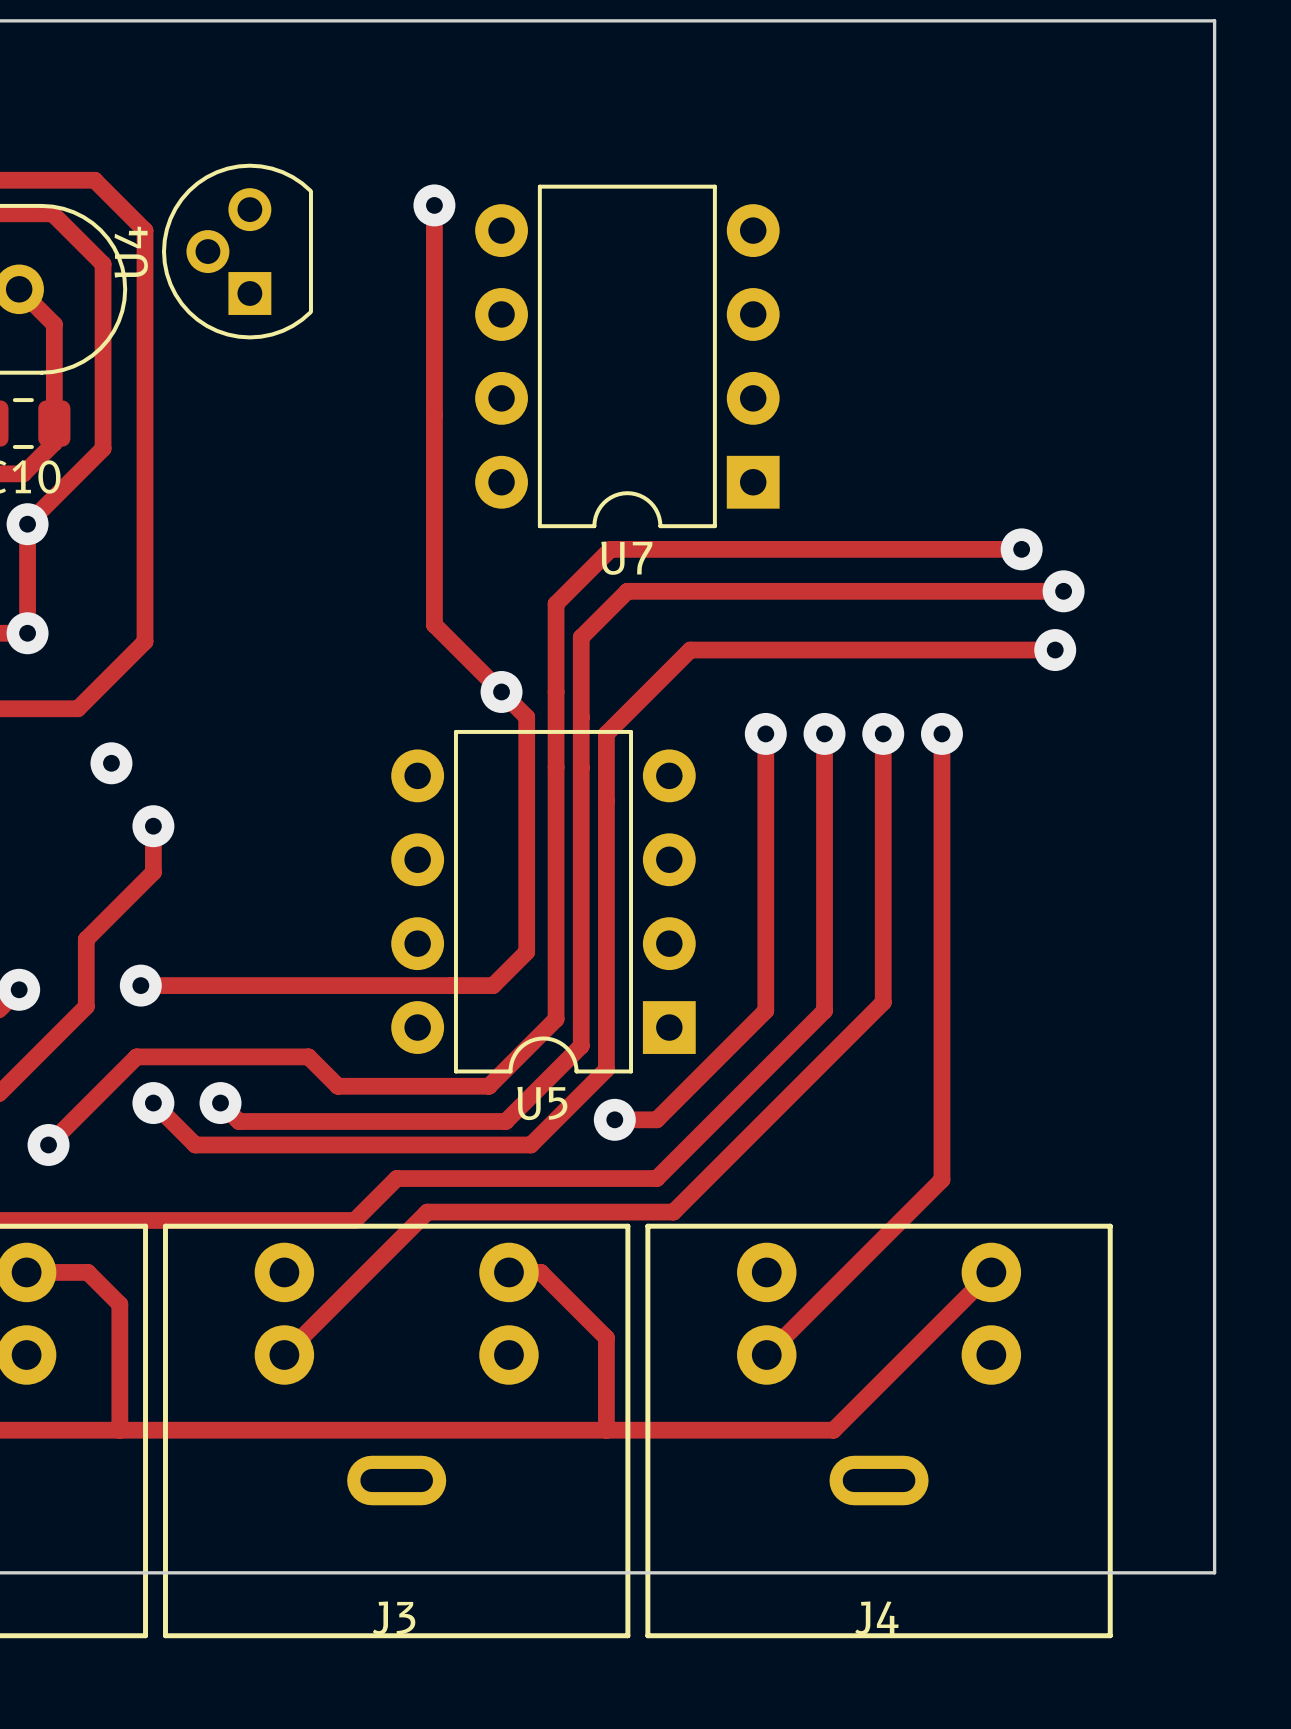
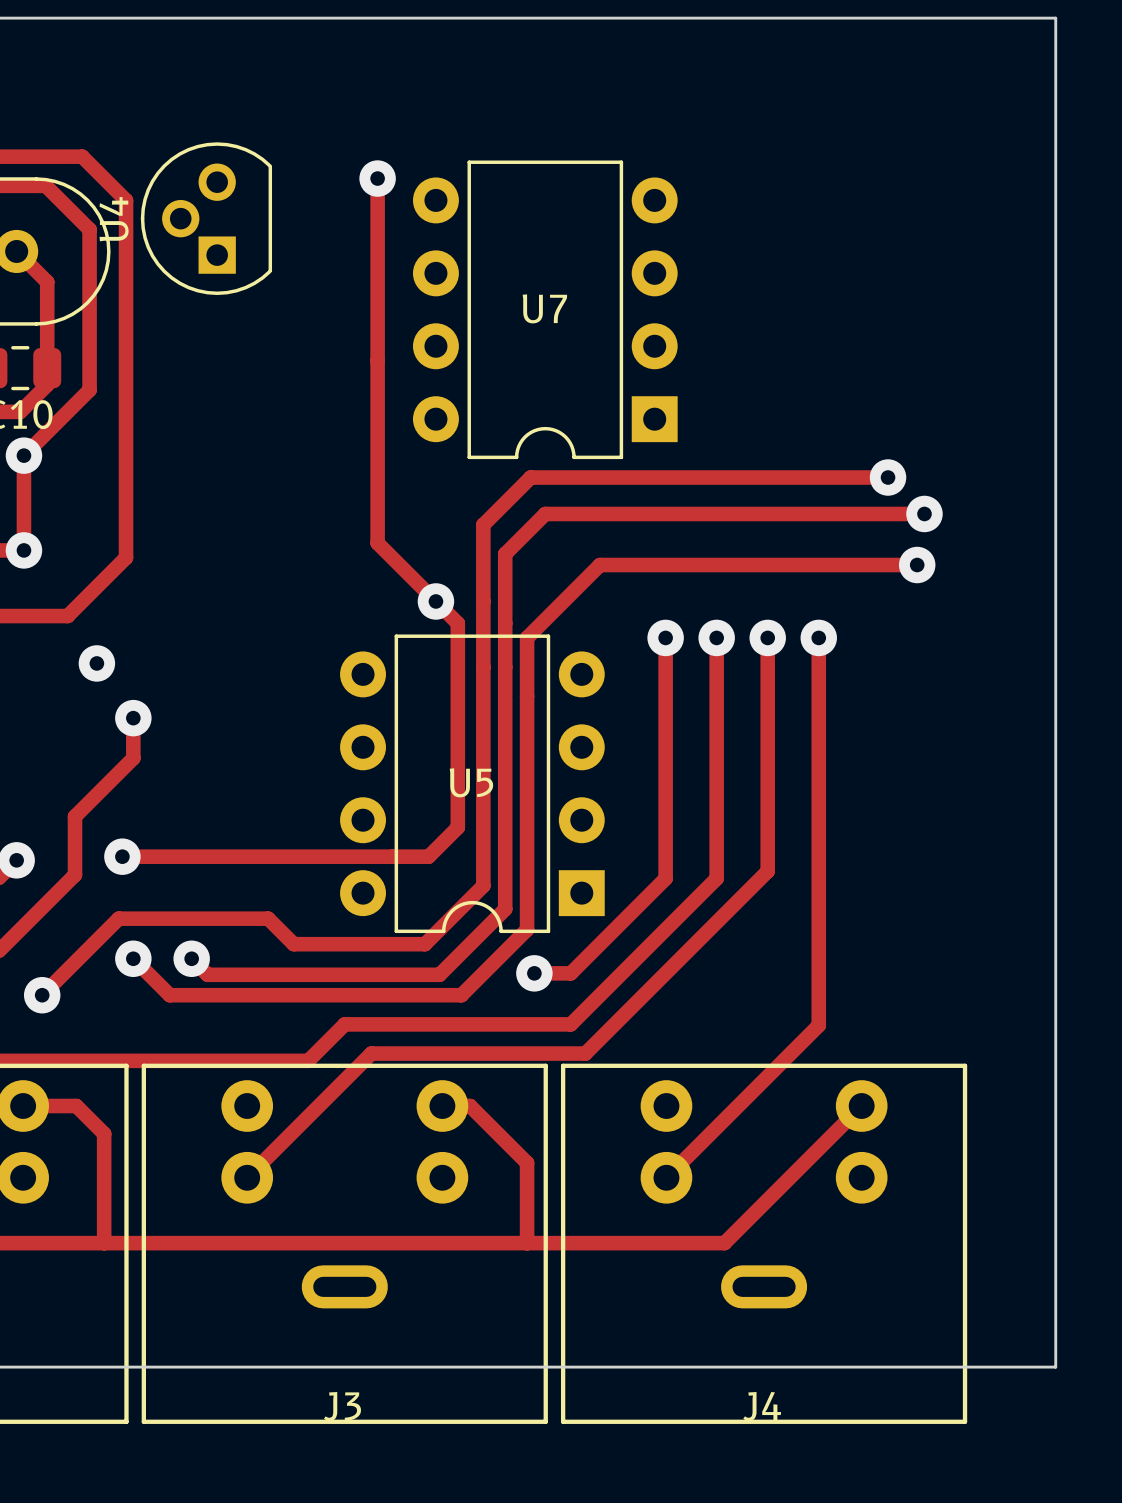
U7 name position: U7 (626, 558) -> U7 (544, 308)
U5 name position: U5 (542, 1103) -> U5 (471, 782)

